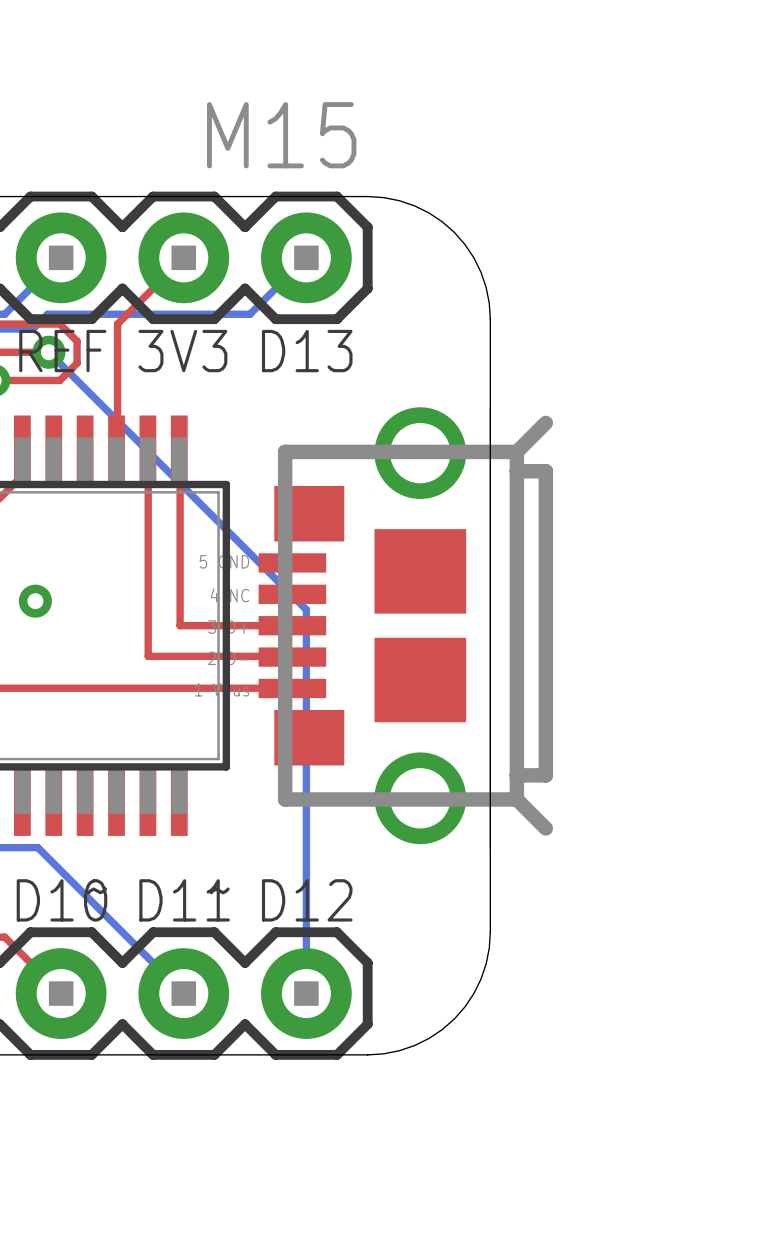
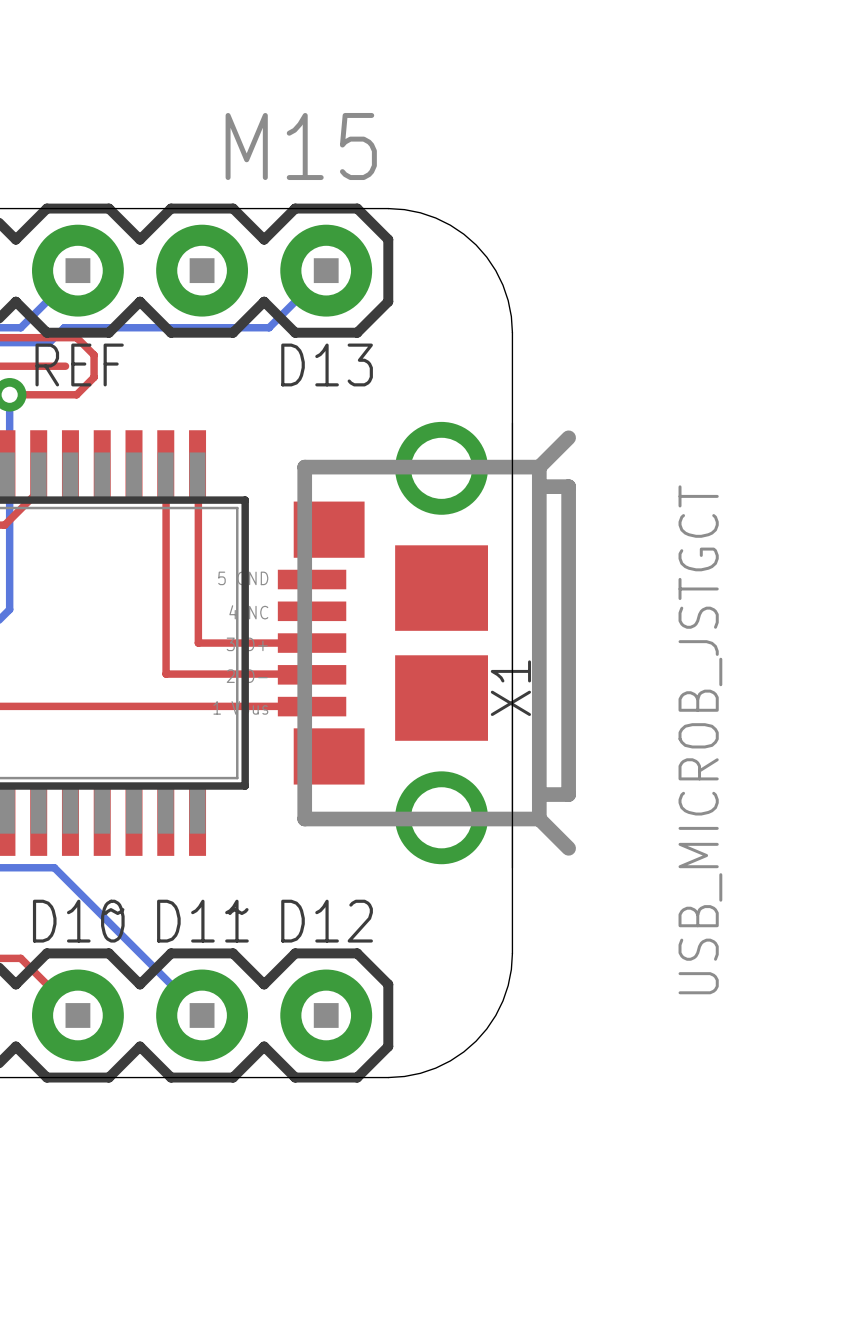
top track: (183, 257) (117, 324) (116, 449) -> none
text: 3V3 (182, 351) -> none
bottom track: (48, 352) (306, 609) (306, 993) -> none
via: (48, 352) -> none
via: (35, 601) -> none
X1 name: none -> X1 (510, 688)
X1 value: none -> USB_MICROB_JSTGCT (700, 739)

